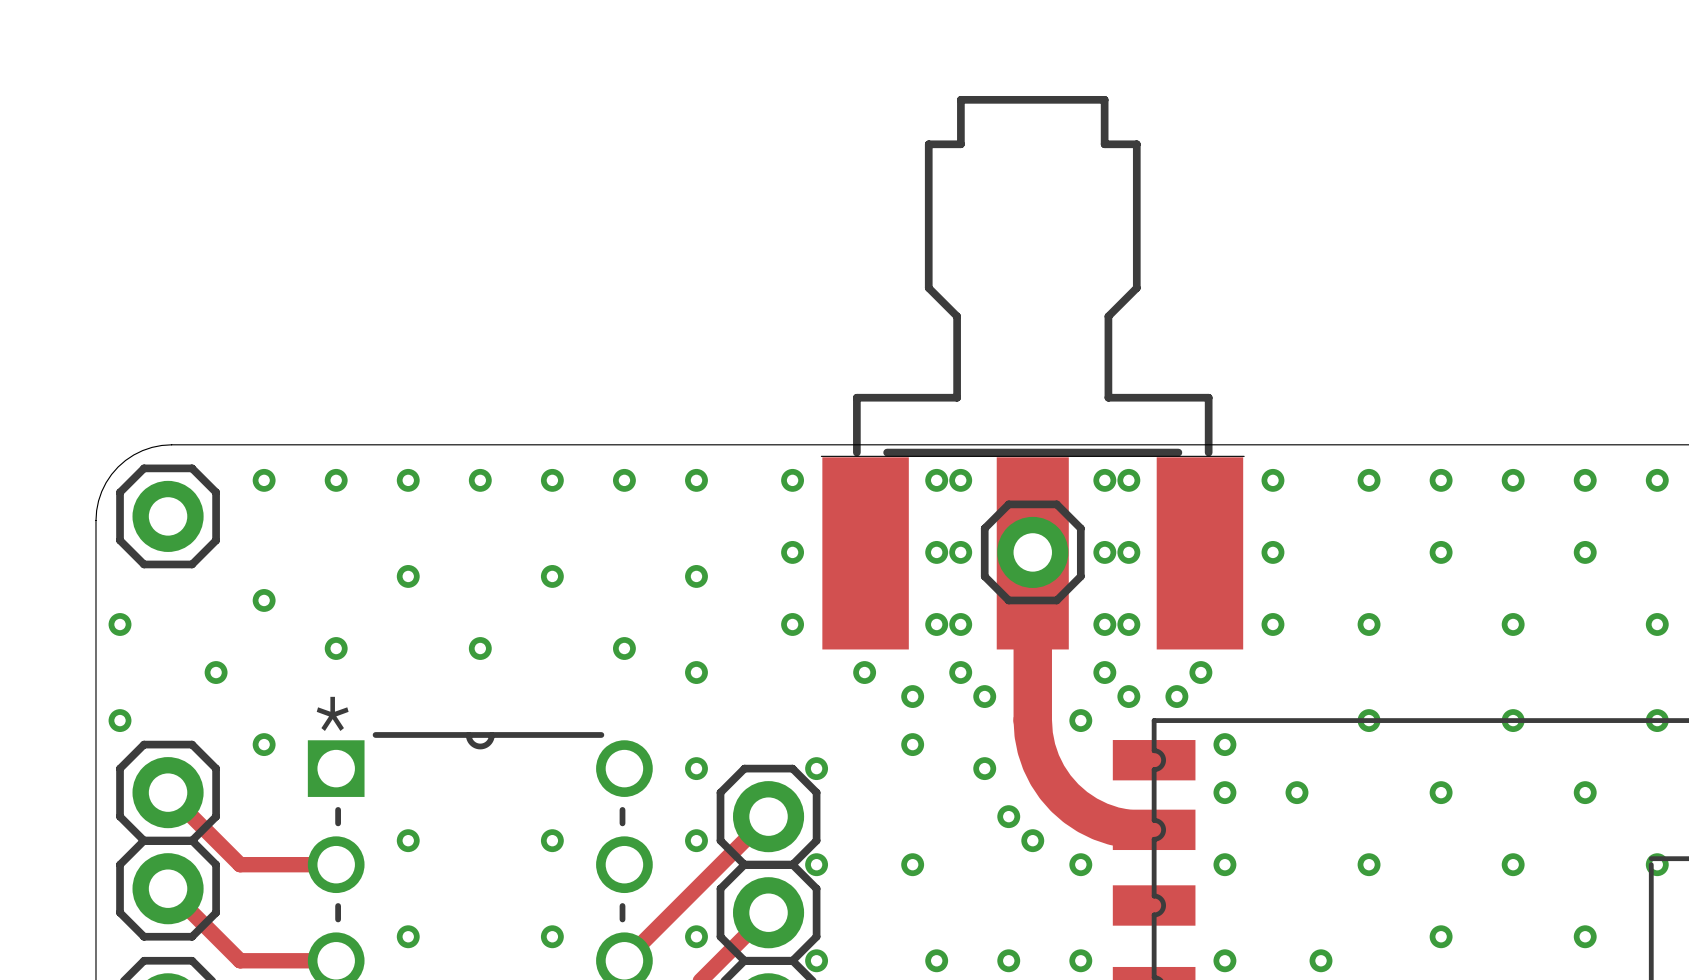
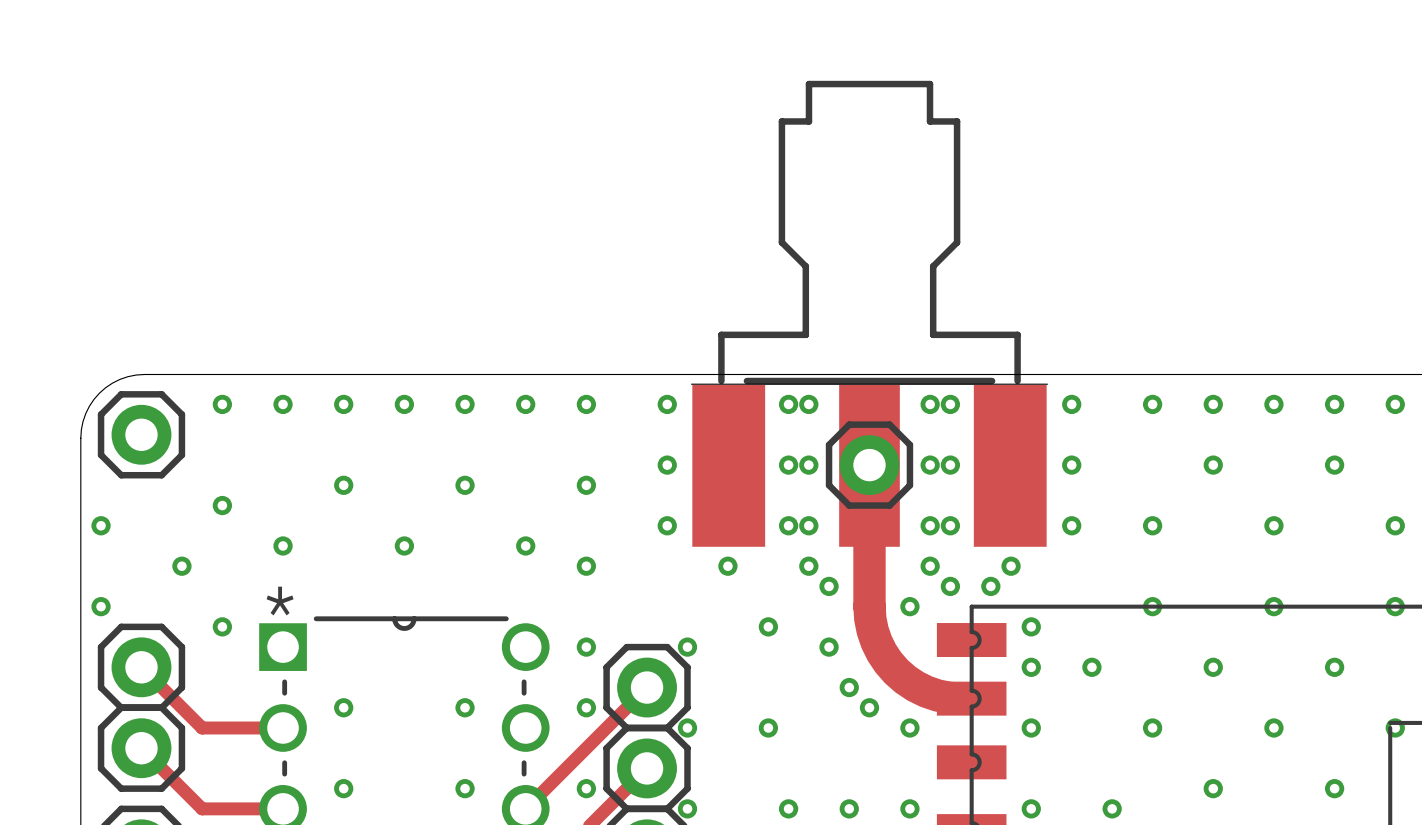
via: (912, 696) -> none

